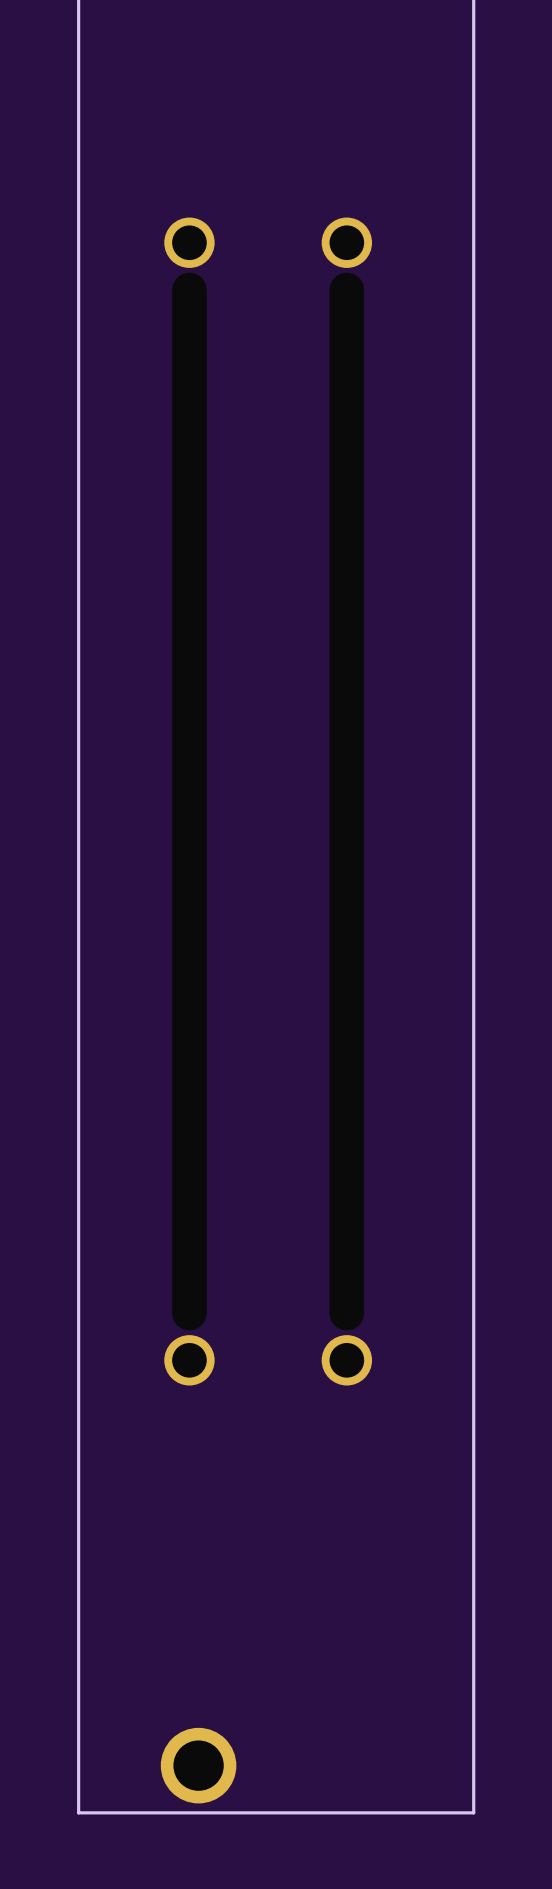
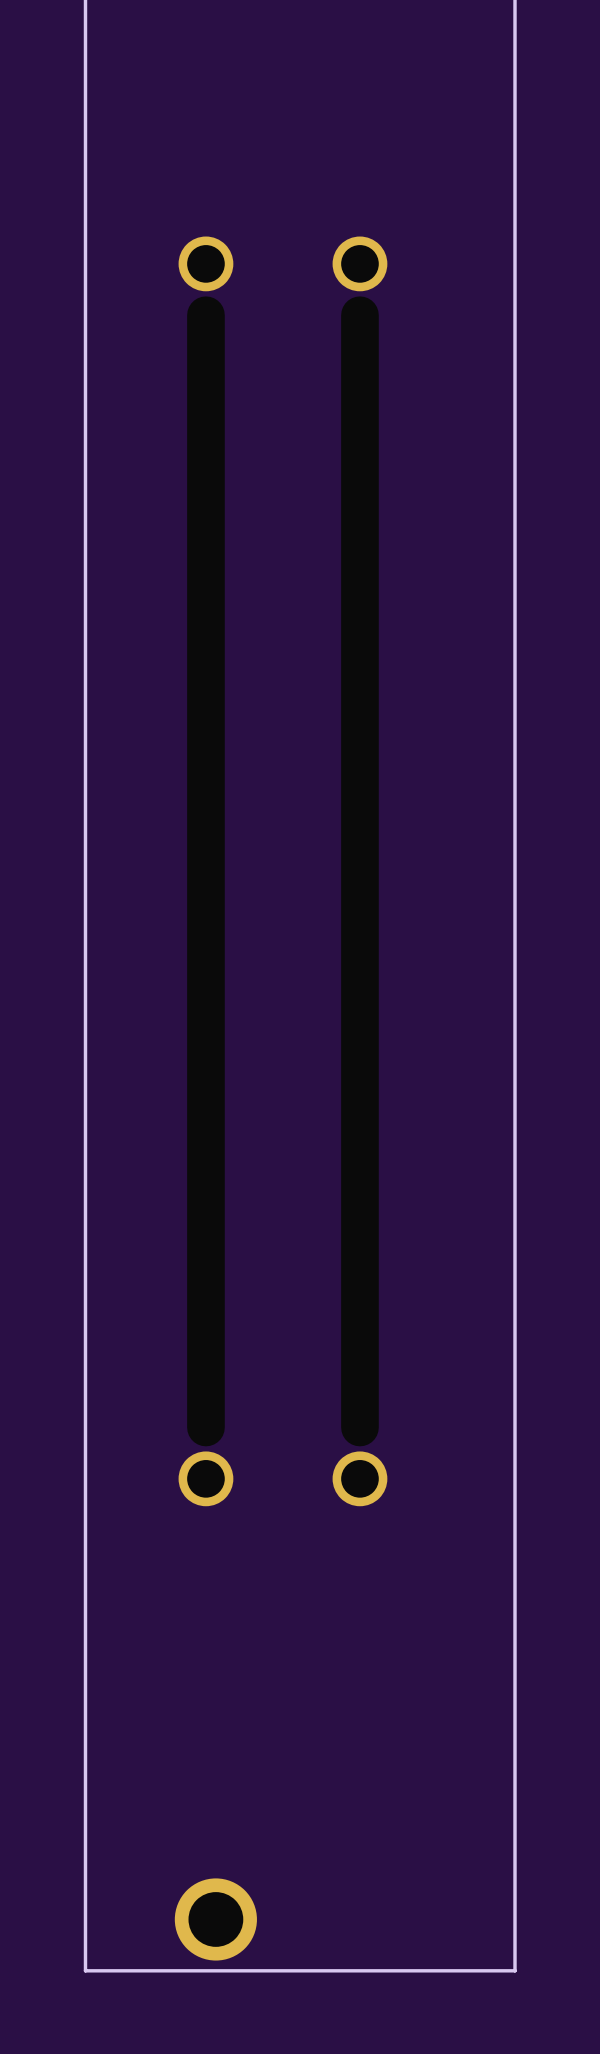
part position: (346, 801) -> (359, 871)

